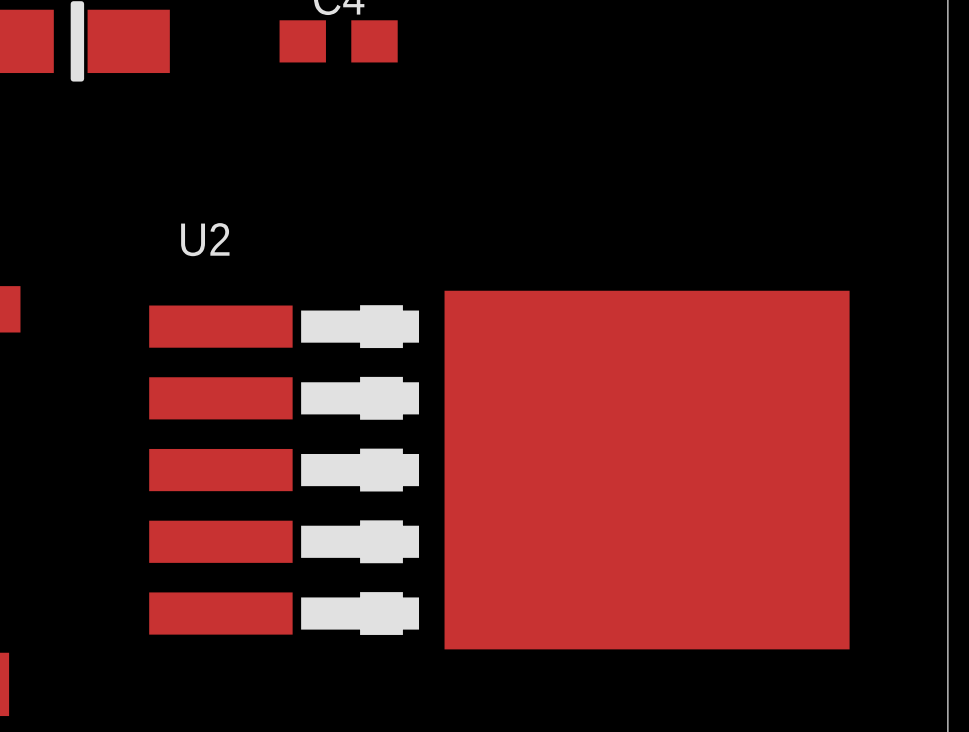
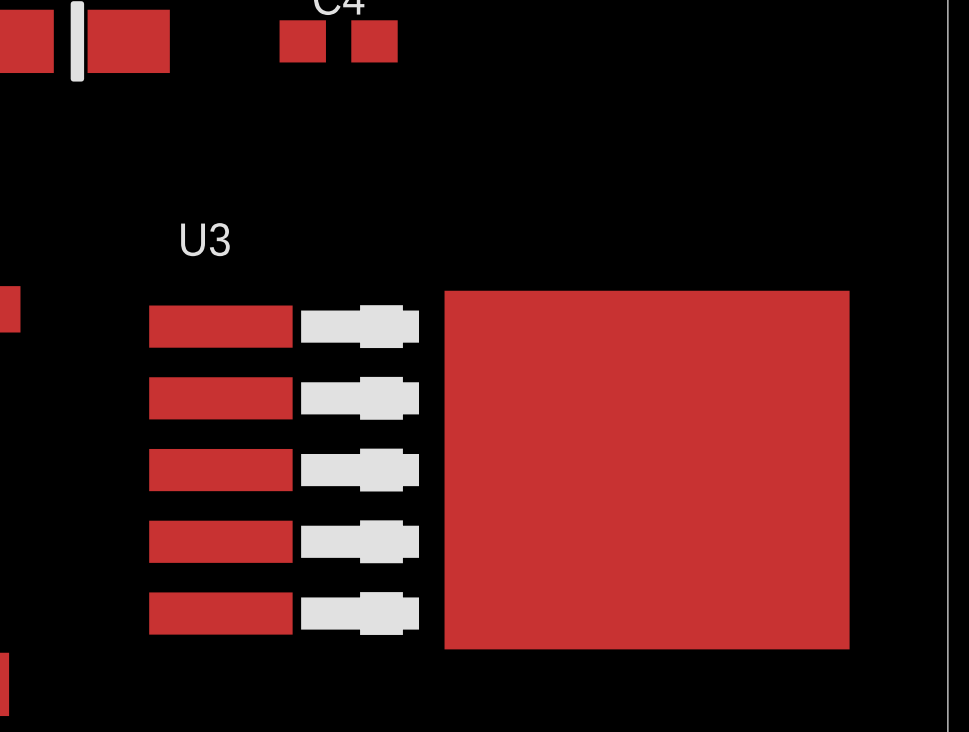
U2 name: U2 (205, 239) -> U3 (205, 239)

